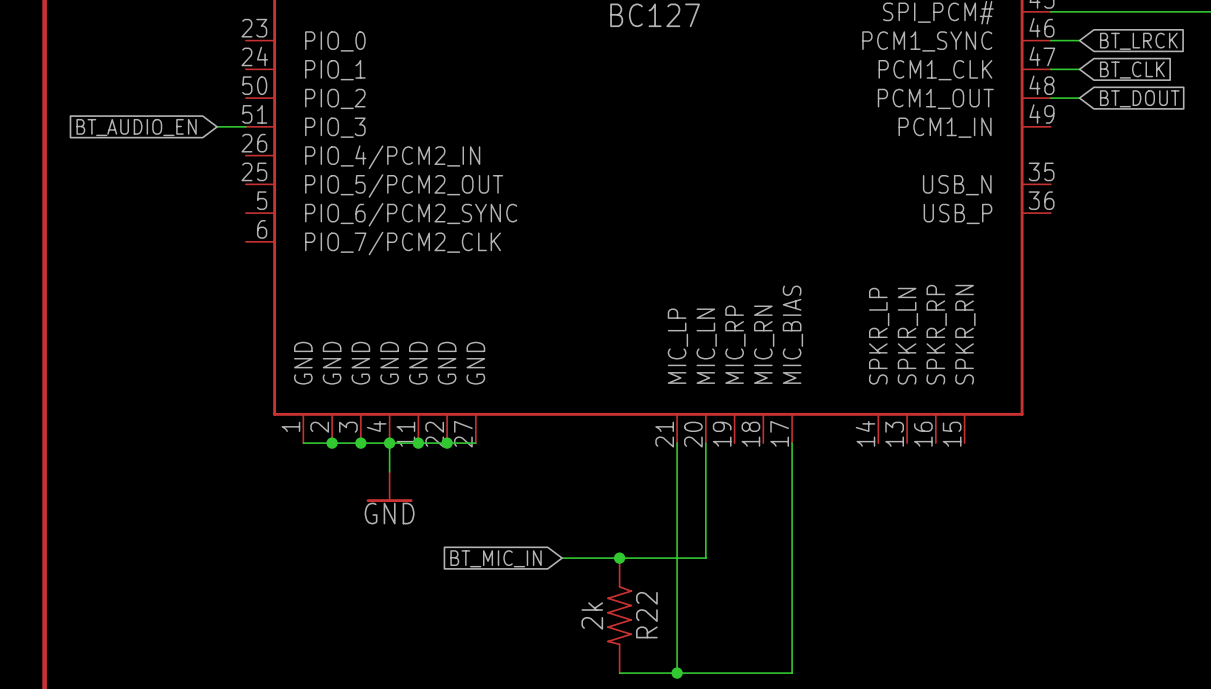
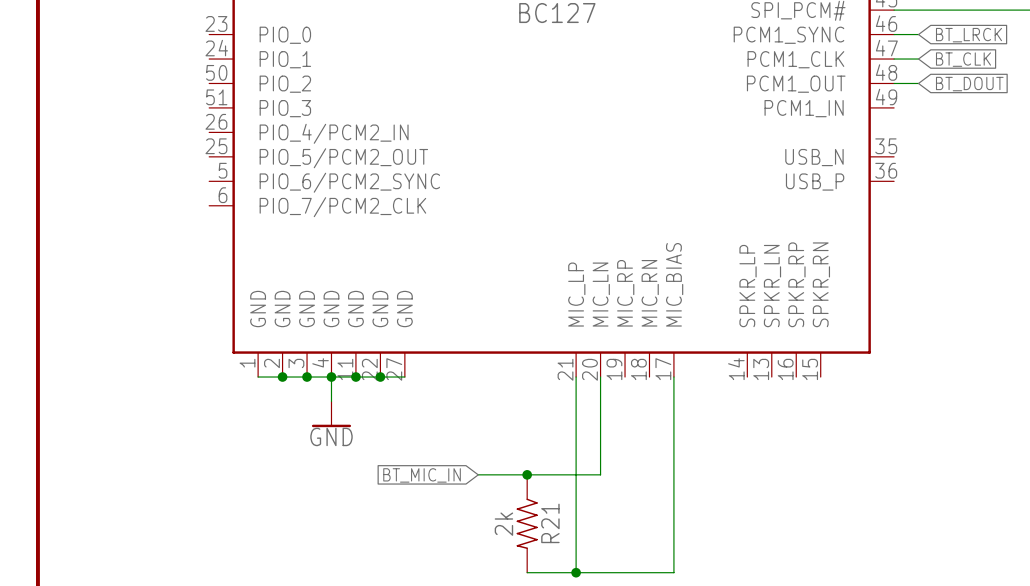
wire: (217, 126) (245, 126) -> none
global label: BT_AUDIO_EN (136, 127) -> none
R22 name: R22 (646, 615) -> R21 (550, 523)

